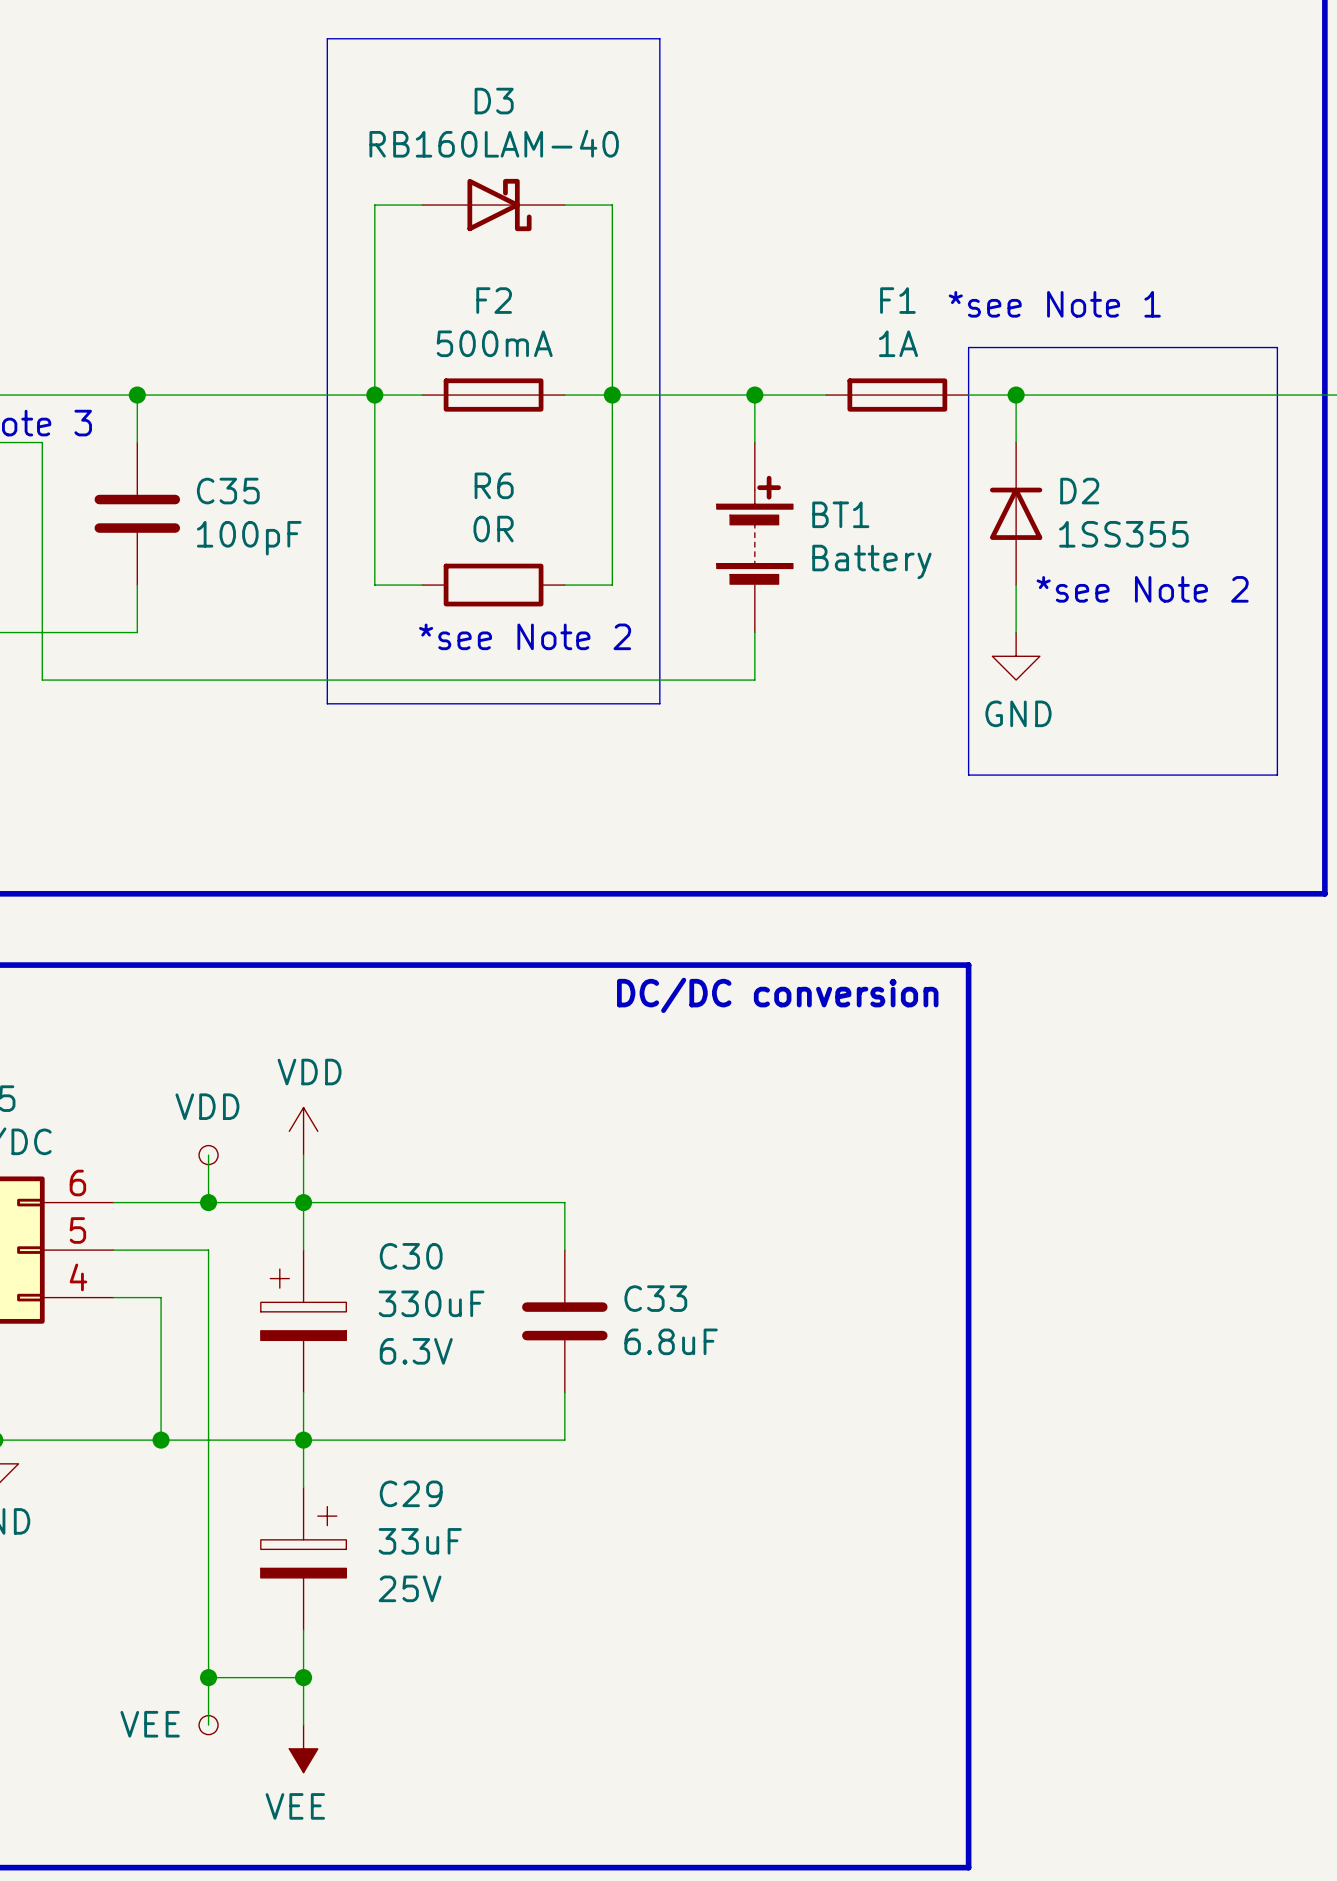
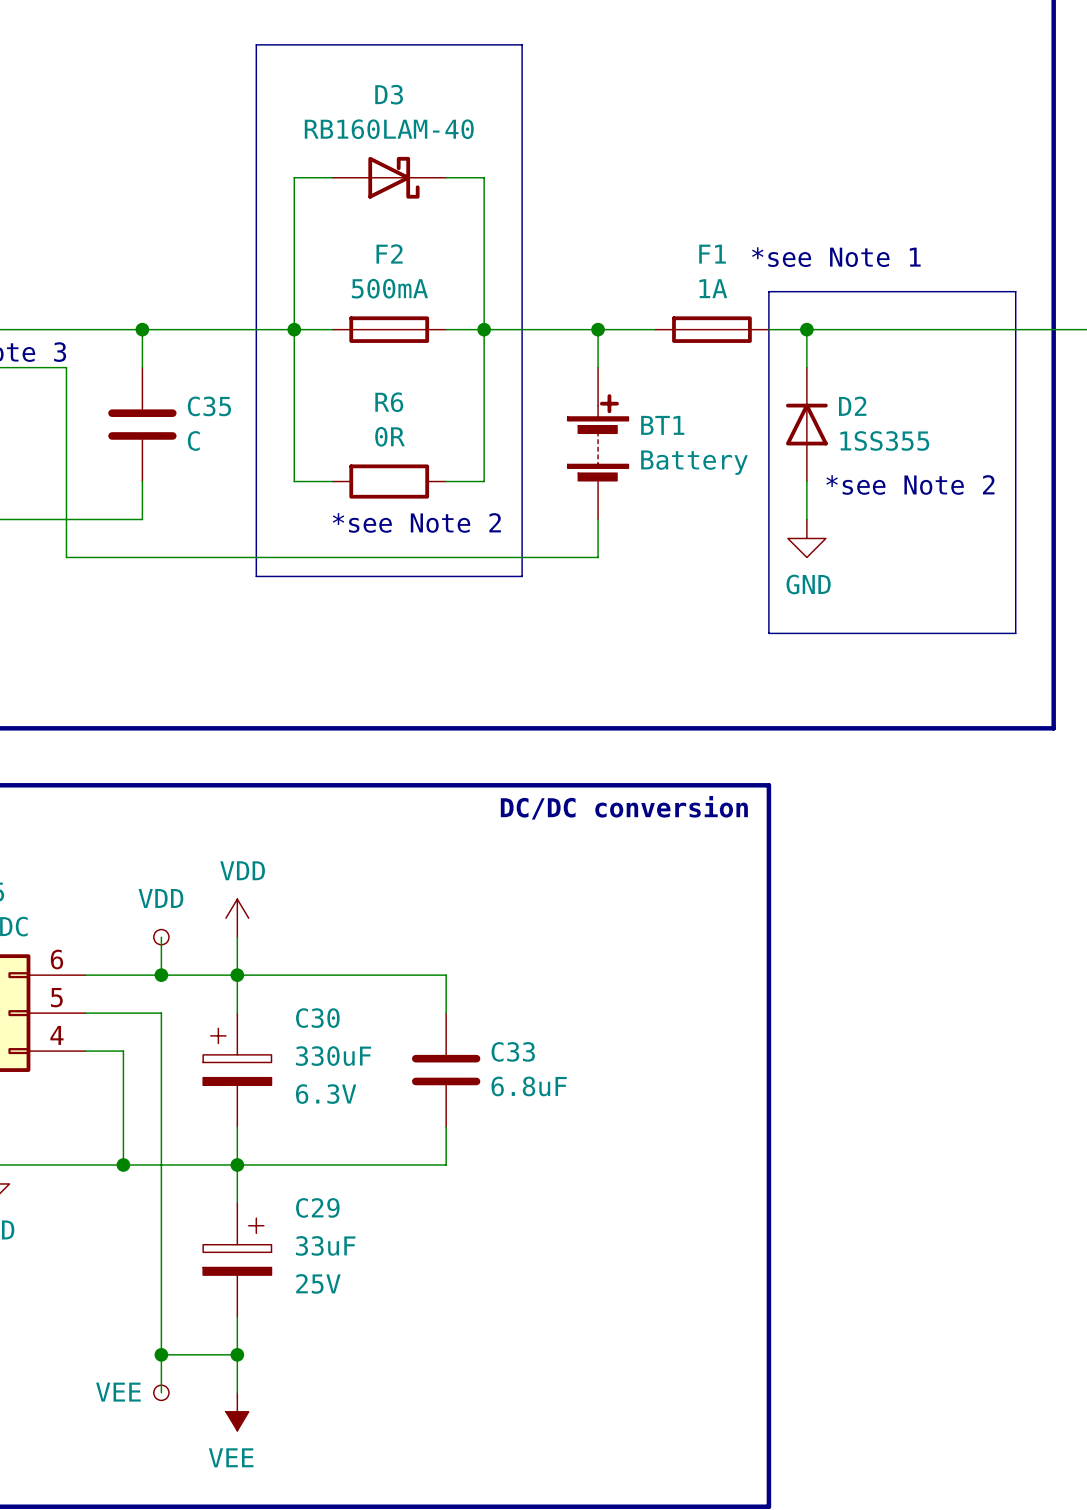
wire: (137, 395) (137, 442) -> (142, 329) (142, 367)
junction position: (137, 395) -> (142, 329)
wire: (42, 442) (42, 680) (89, 680) -> (28, 367) (66, 367) (66, 557)
C35 position: (137, 513) -> (142, 424)
C35 value: 100pF (249, 538) -> C (193, 440)
wire: (137, 585) (137, 632) -> (142, 481) (142, 519) (104, 519)

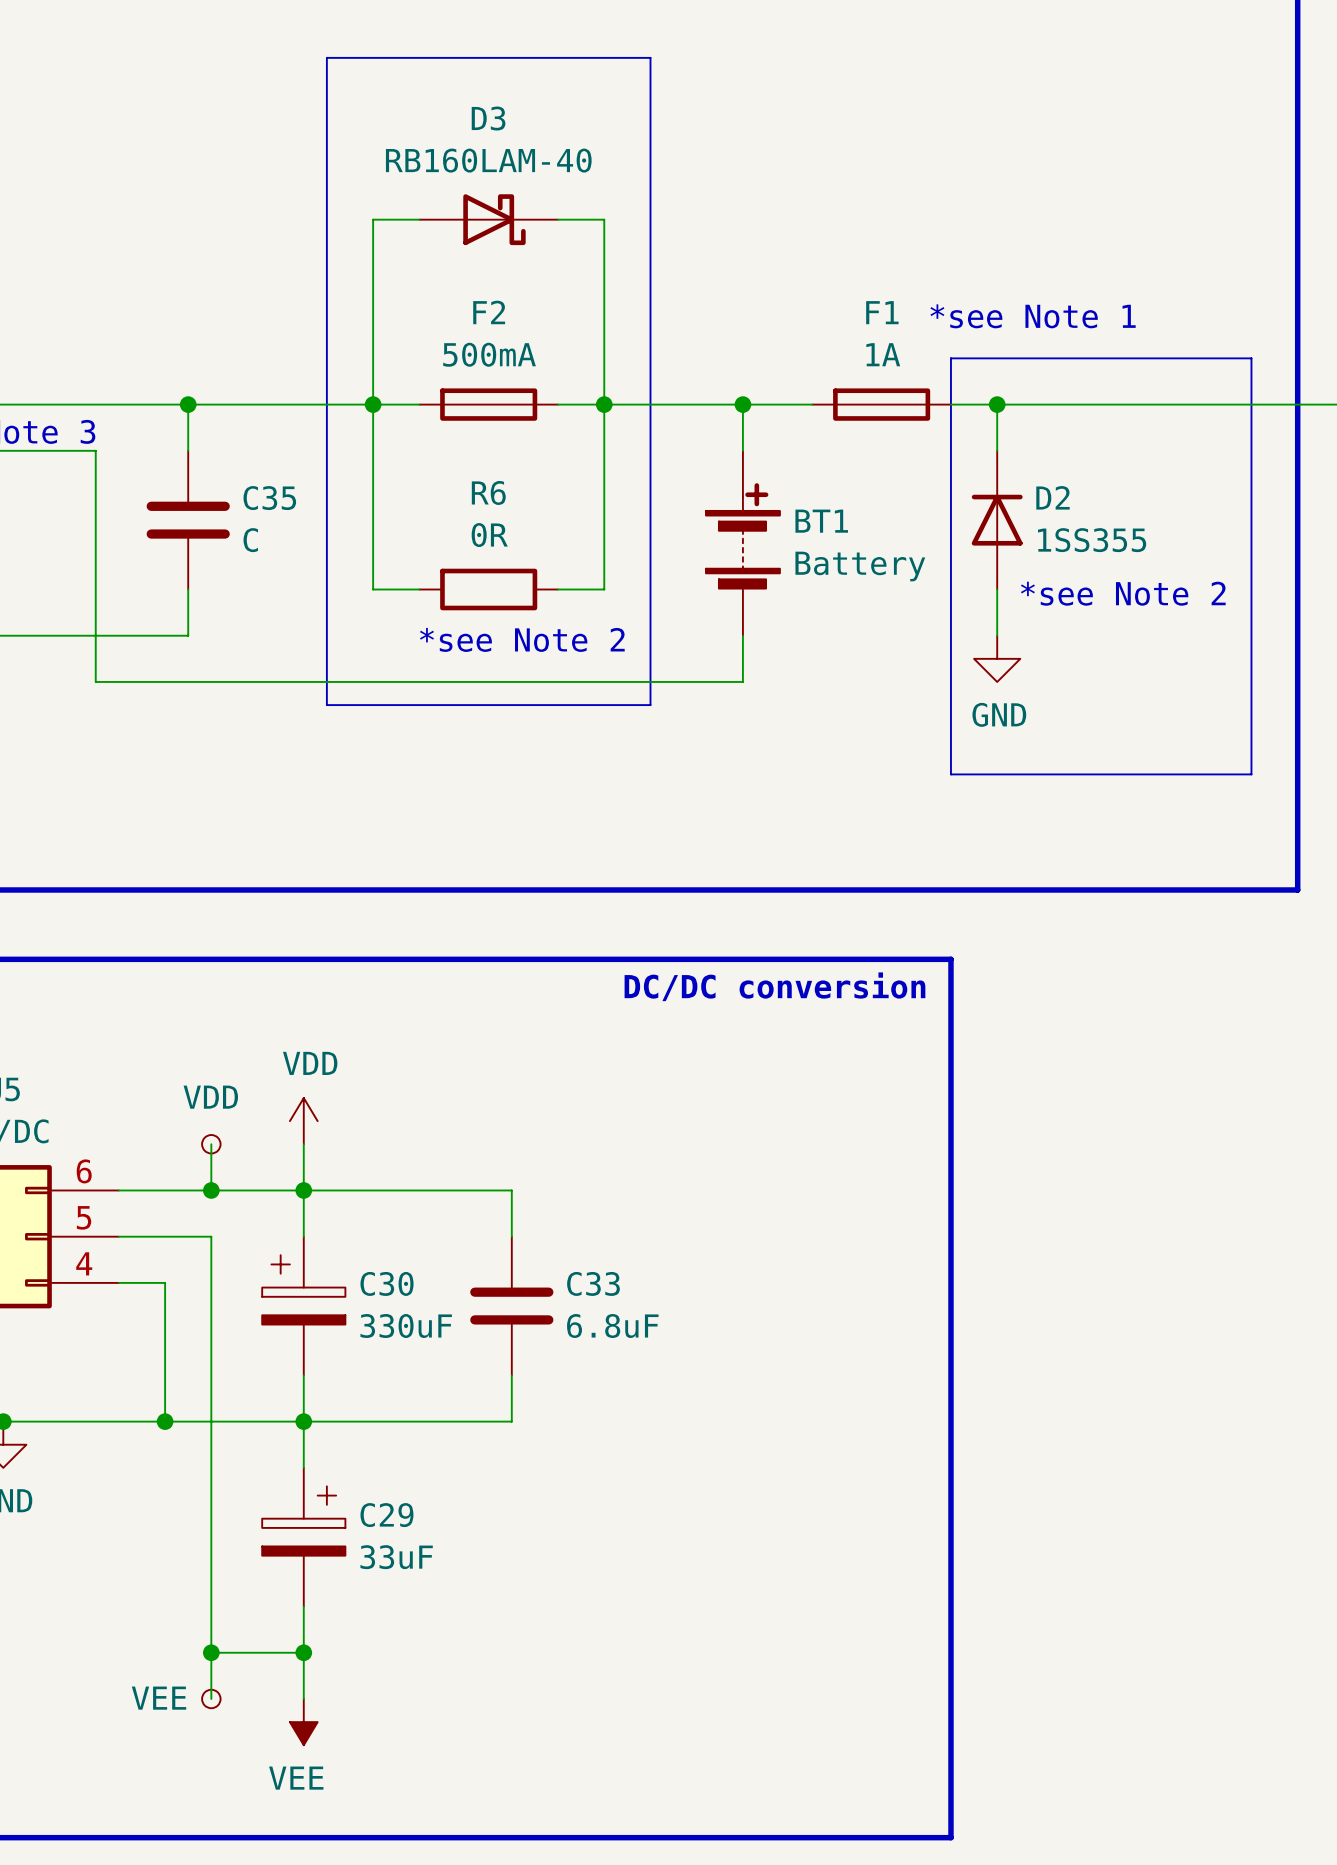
wire: (408, 975) (446, 975) (446, 1013) -> (511, 1190) (511, 1236)
C30 name position: C30 (317, 1018) -> C30 (387, 1283)
C30 value position: 330uF (333, 1056) -> 330uF (406, 1326)
C33 position: (446, 1070) -> (511, 1306)
C30 text: 6.3V (326, 1094) -> none
wire: (446, 1127) (446, 1164) (408, 1164) -> (511, 1375) (511, 1421)
C29 name position: C29 (317, 1207) -> C29 (386, 1515)
C29 value position: 33uF (325, 1245) -> 33uF (396, 1557)
C29 text: 25V (318, 1283) -> none

